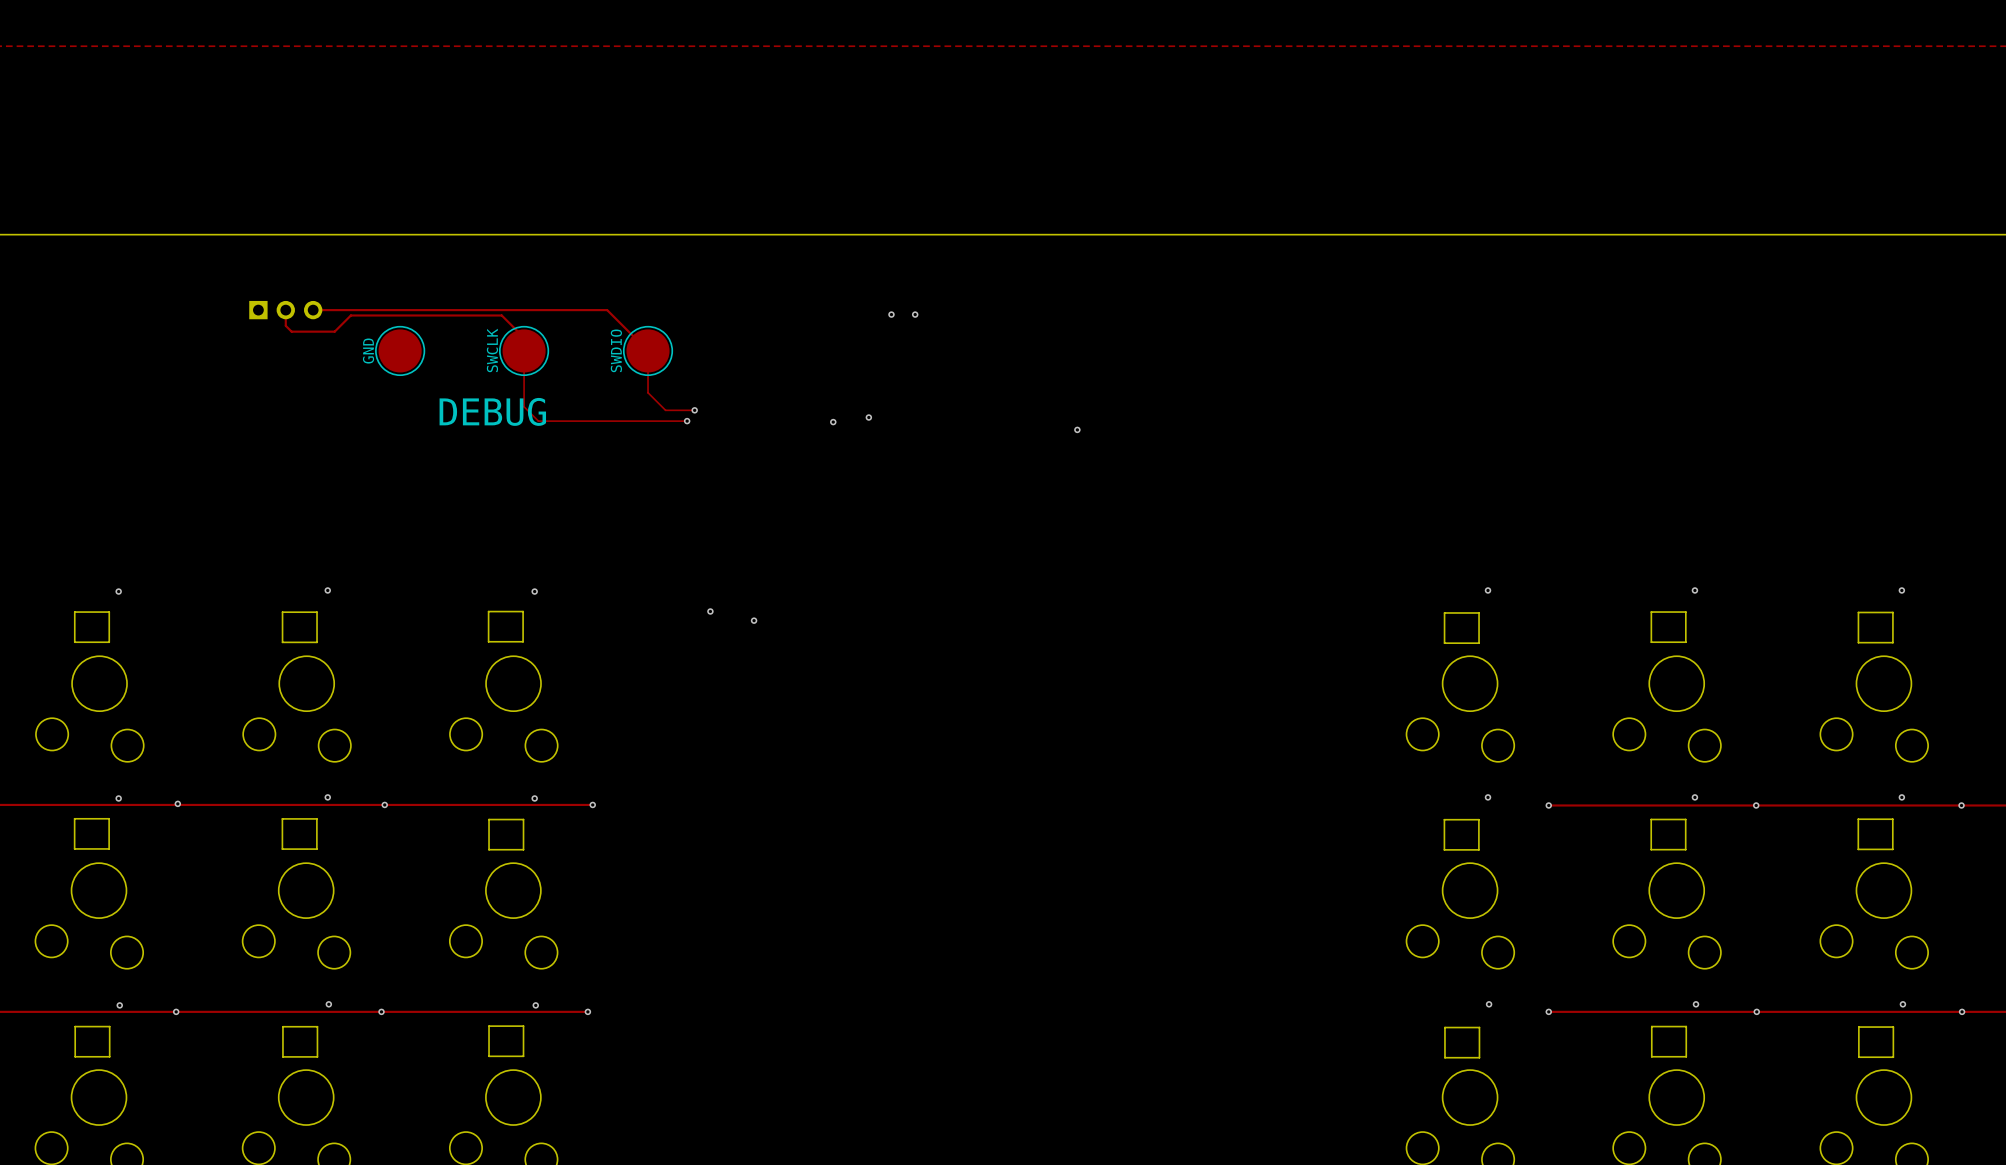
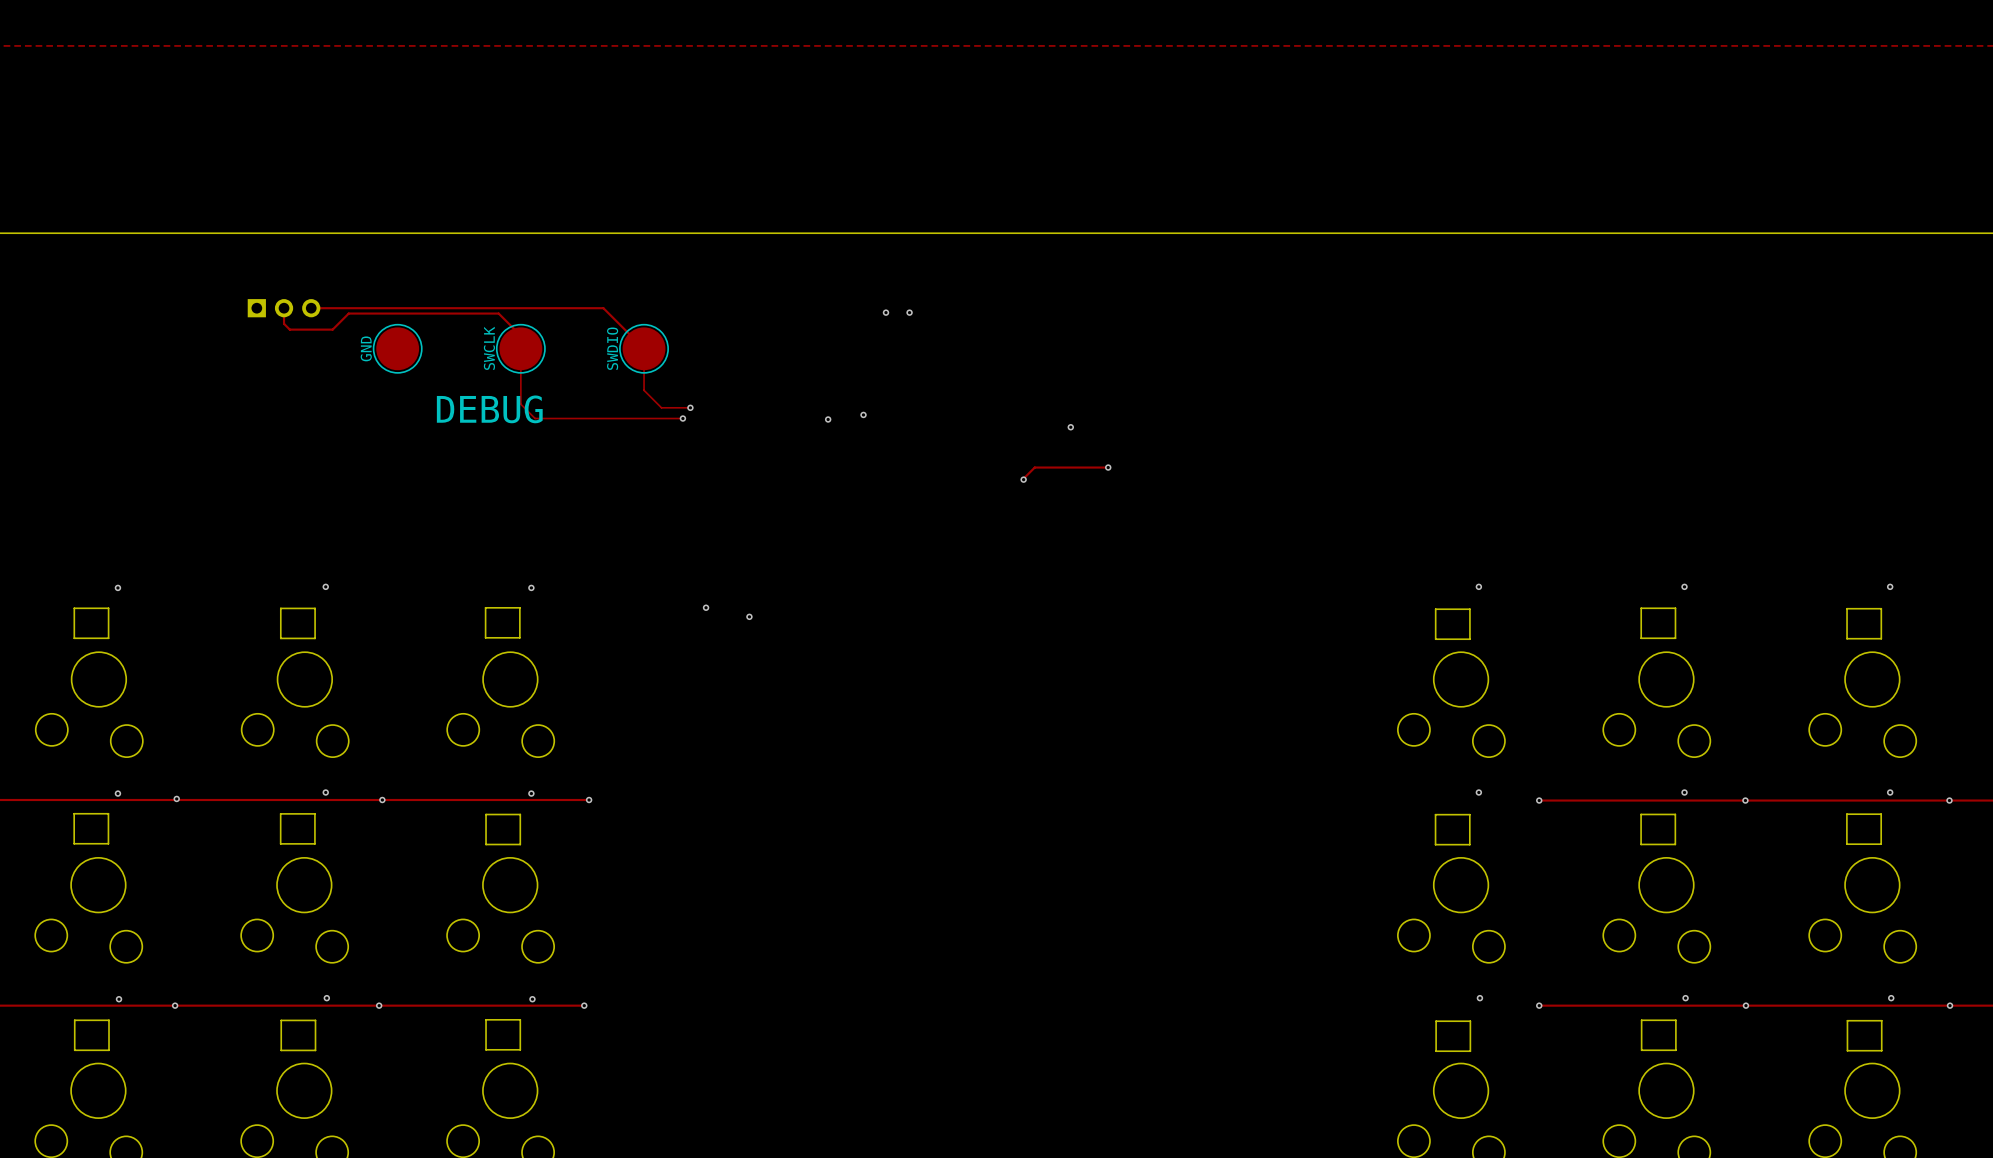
track: none -> (1108, 467) (1034, 467) (1023, 479)
via: none -> (1108, 467)
via: none -> (1023, 479)

